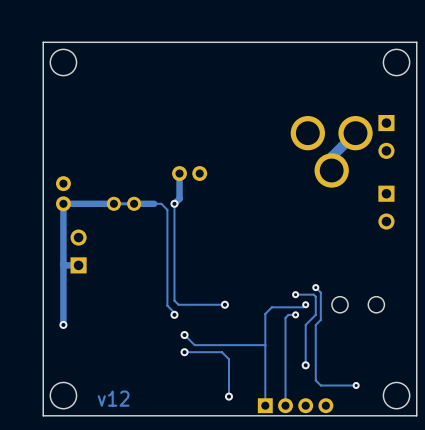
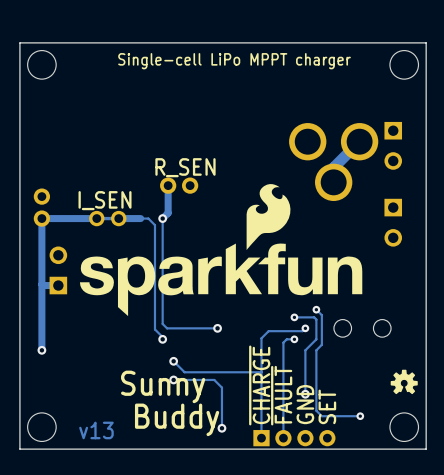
text: none -> Single-cell LiPo MPPT charger (234, 61)
text: none -> R_SEN (185, 167)
drawing: none -> [79, 184, 363, 317]
text: none -> I_SEN (105, 200)
drawing: none -> [390, 369, 418, 395]
text: none -> ~{CHARGE} (259, 385)
text: none -> Sunny (163, 386)
text: none -> ~{FAULT} (281, 395)
text: none -> GND (305, 404)
text: none -> SET (327, 406)
text: none -> Buddy (177, 419)
text: v12 (113, 398) -> v13 (96, 430)

